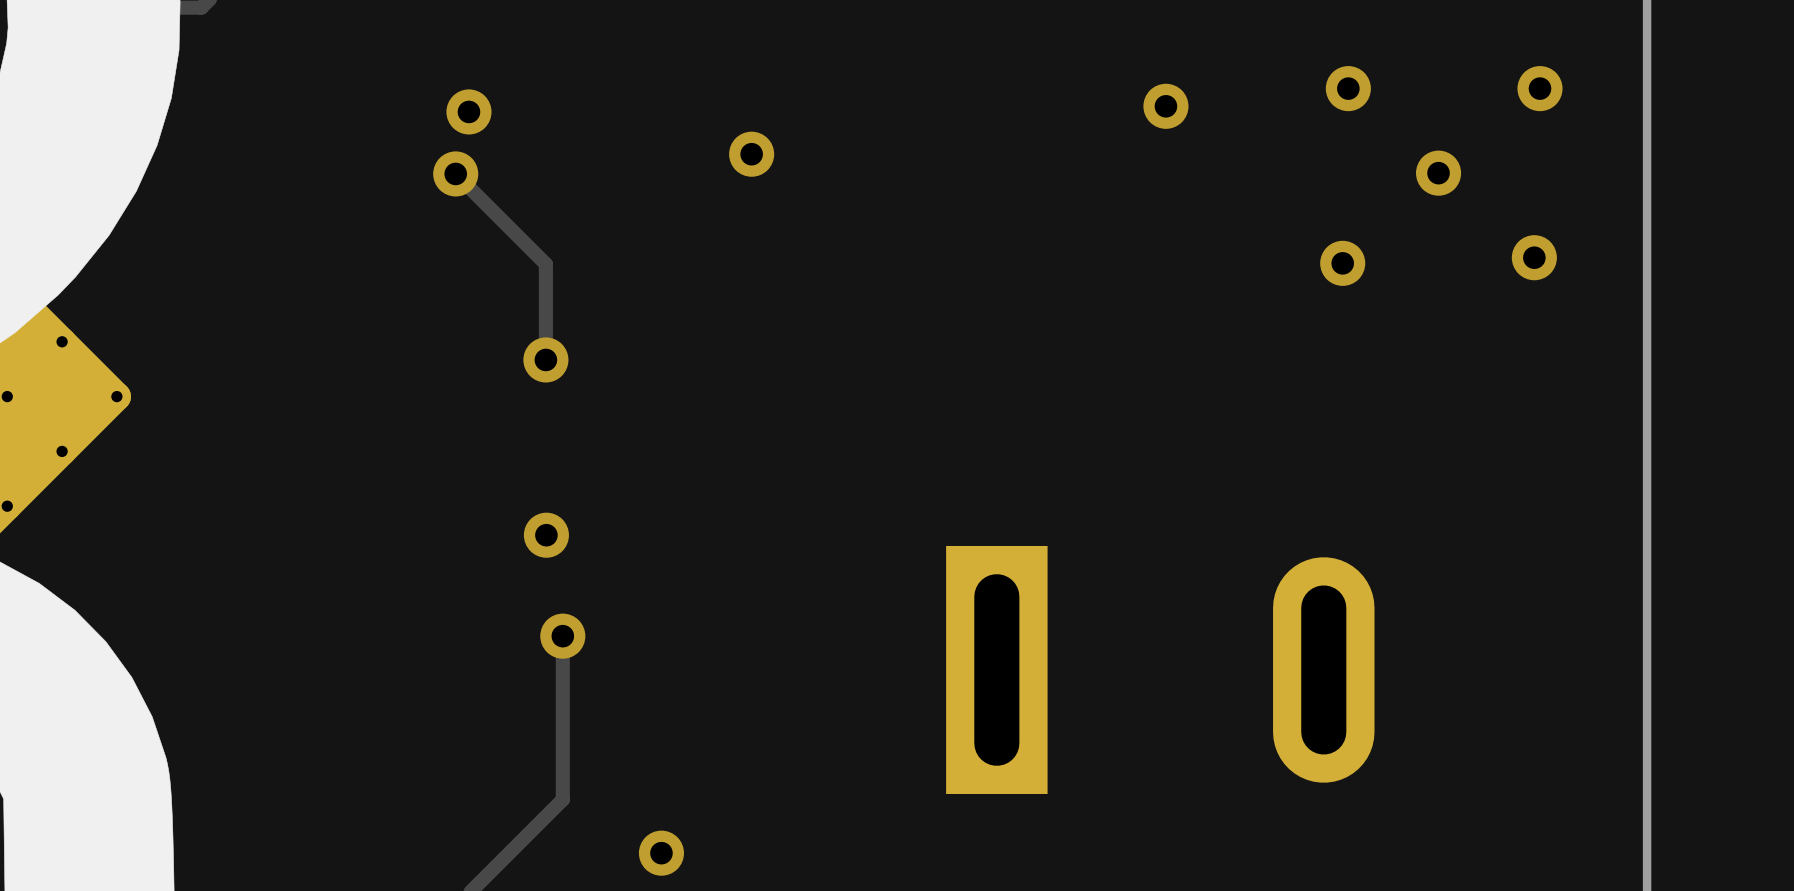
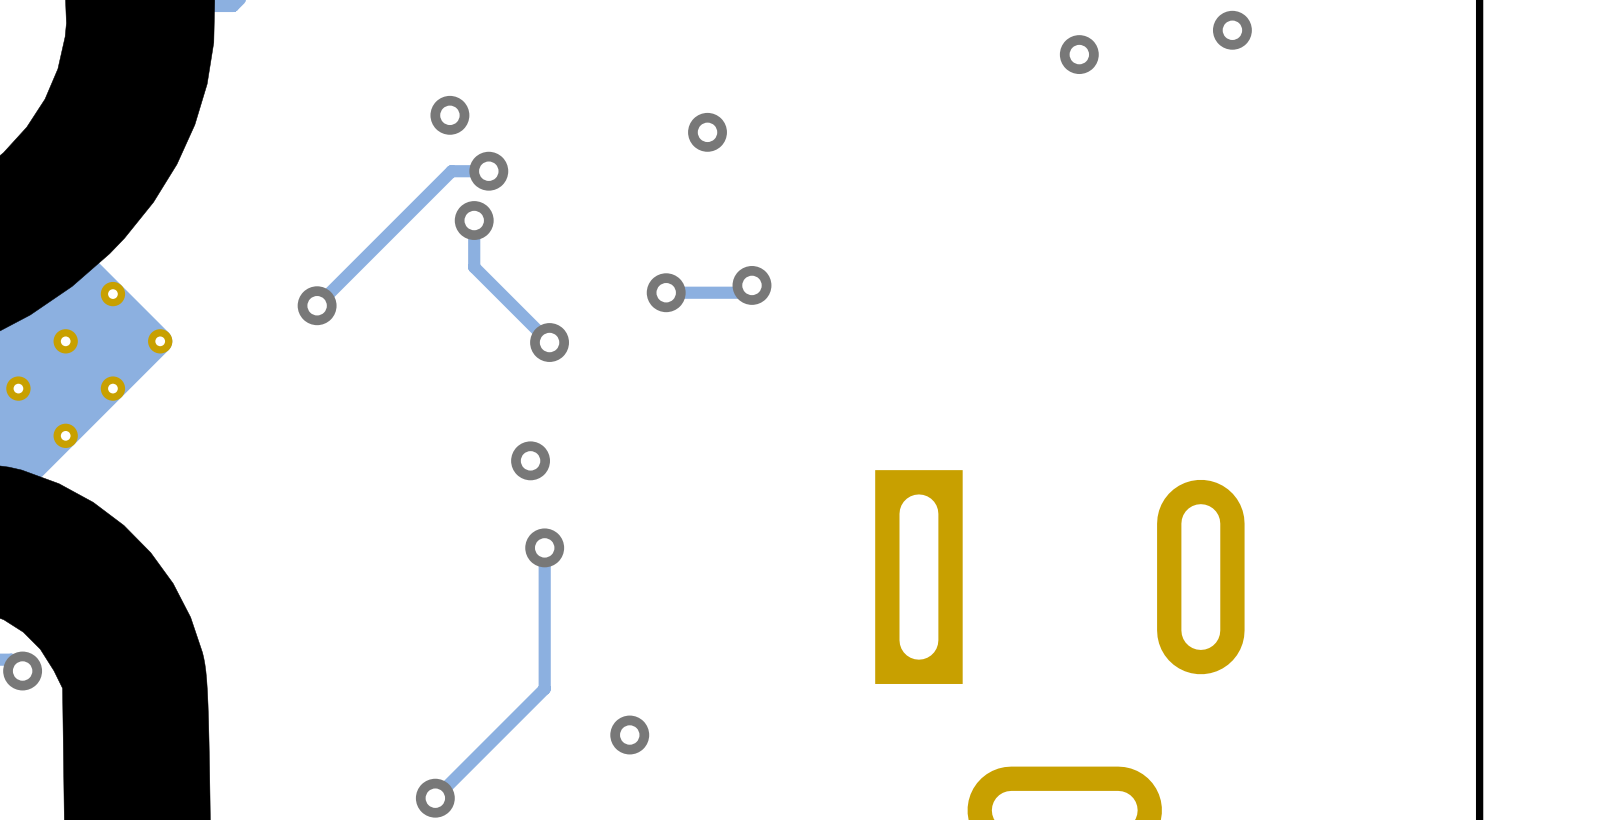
via position: (1348, 88) -> (1232, 30)
via: (1540, 88) -> none
via position: (1165, 106) -> (1079, 54)
via: (468, 111) -> none
via: none -> (449, 115)
track: (455, 173) (545, 264) (545, 359) -> none
via: (455, 173) -> none
via: (1438, 173) -> none
track: none -> (488, 171) (451, 171) (317, 305)
via: none -> (488, 171)
track: none -> (474, 220) (474, 267) (549, 342)
via: none -> (474, 220)
via: (1534, 257) -> none
via: (1342, 263) -> none
track: none -> (751, 285) (744, 292) (666, 292)
via: none -> (751, 285)
via: none -> (666, 292)
via: none -> (317, 305)
via position: (545, 359) -> (549, 342)

